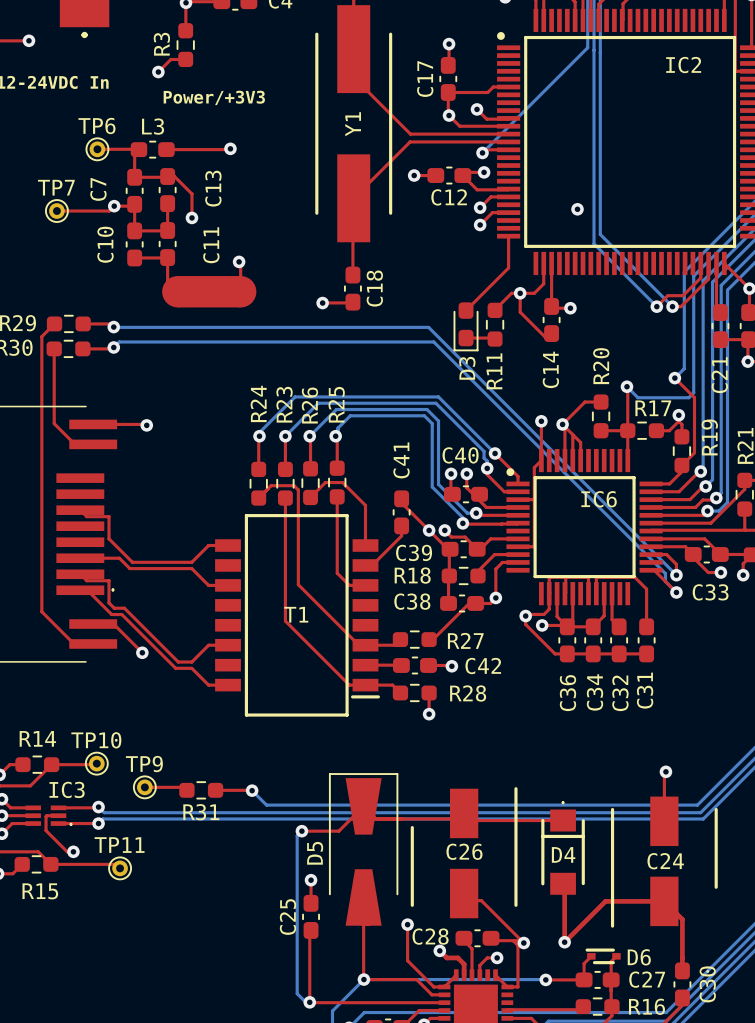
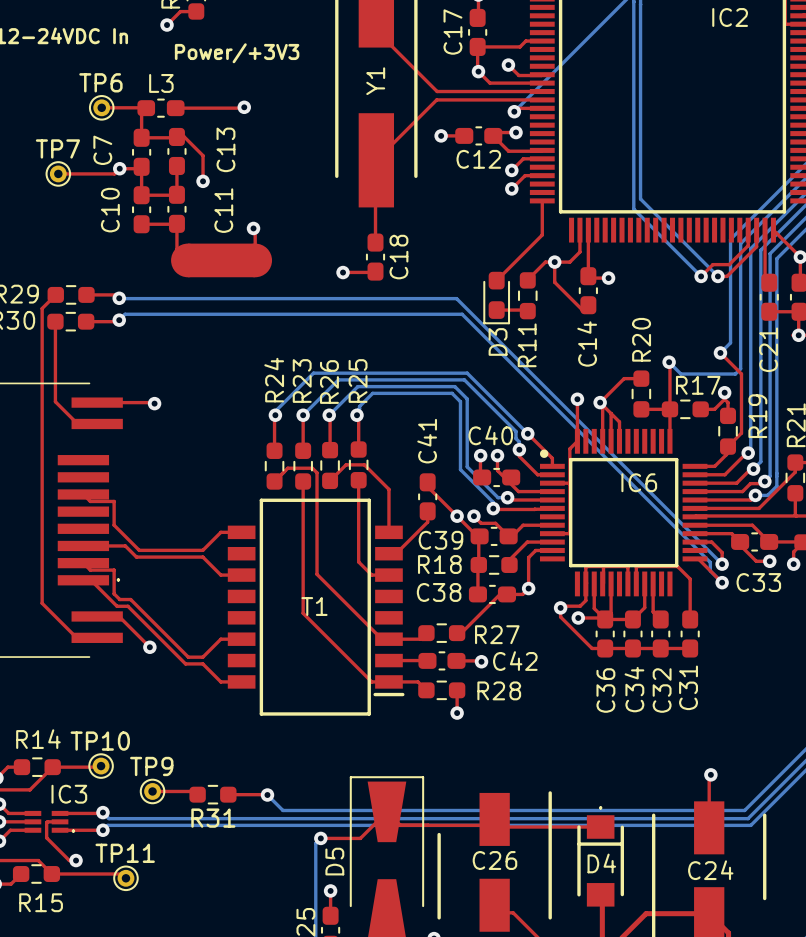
via: (577, 209) -> none

